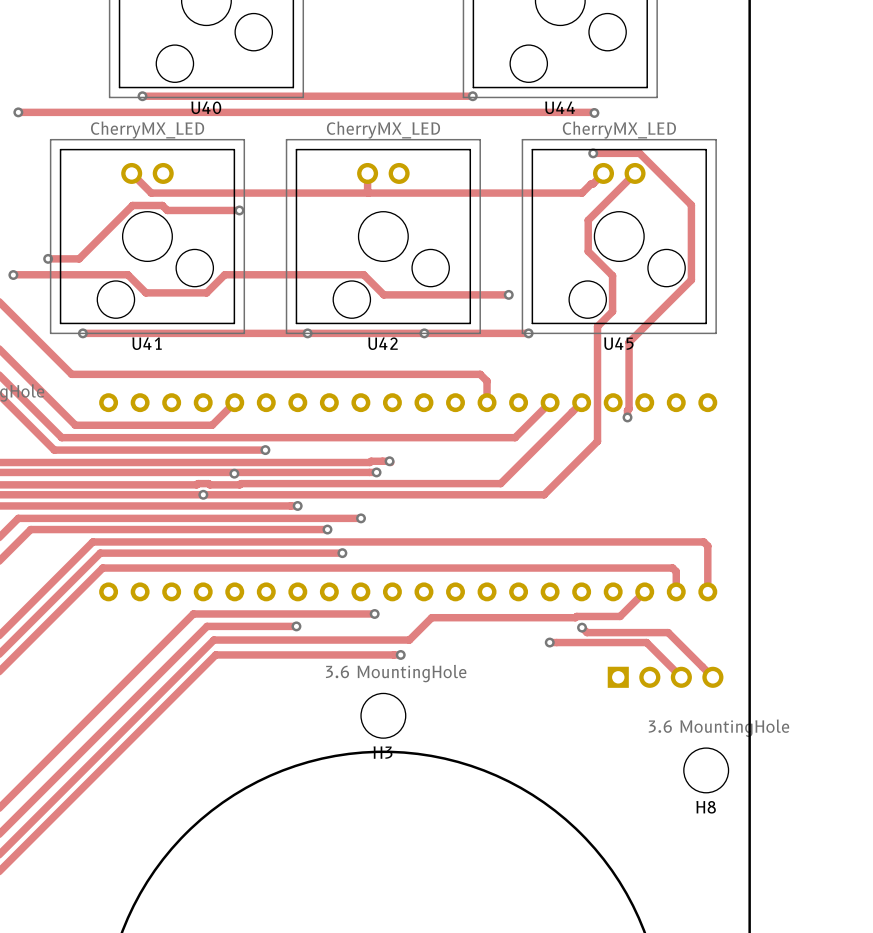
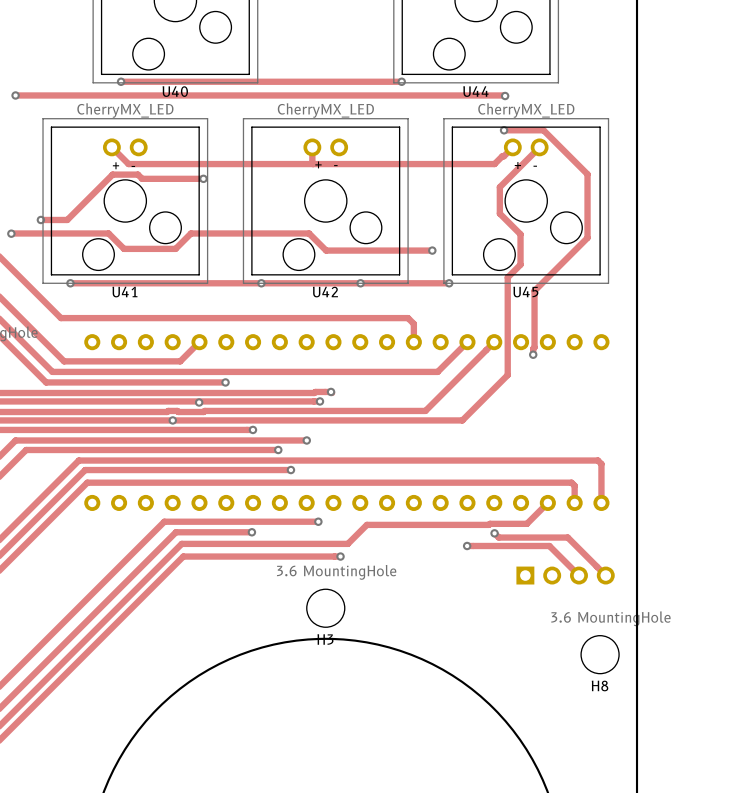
text: none -> + - (326, 164)
text: none -> + - (525, 165)
text: none -> + - (123, 165)

